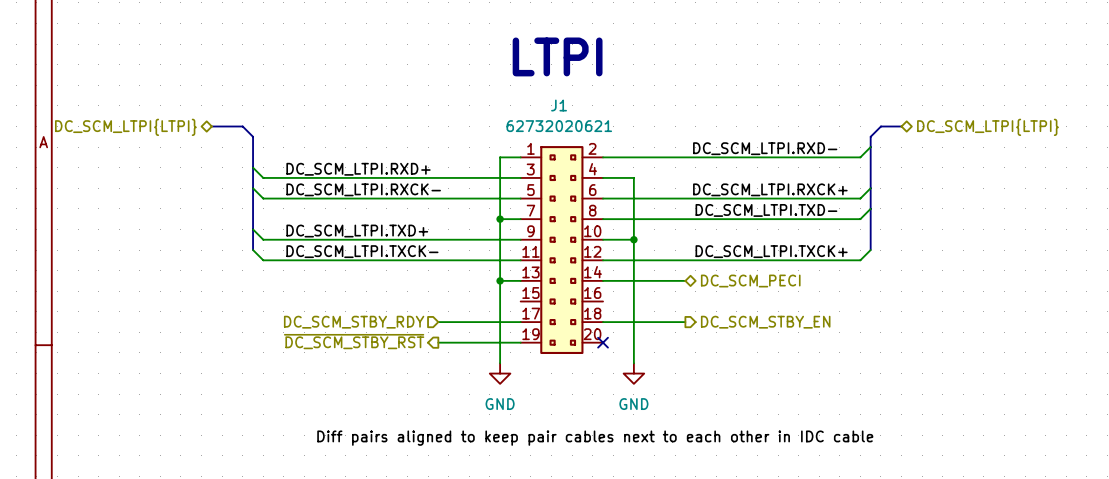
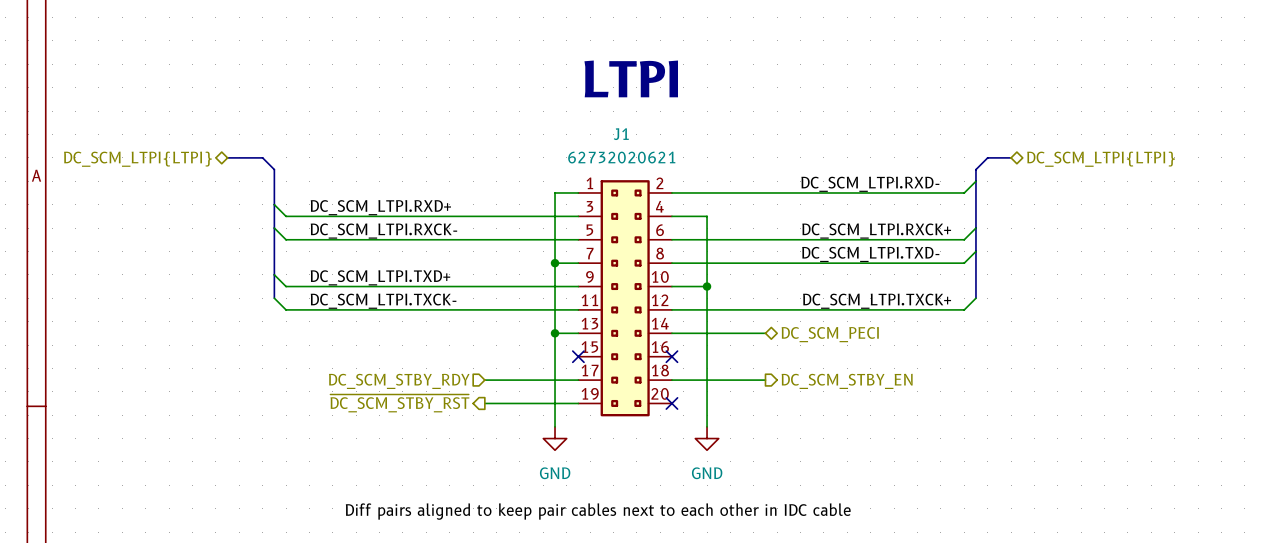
no-connect mark: none -> (578, 356)
no-connect mark: none -> (671, 356)

